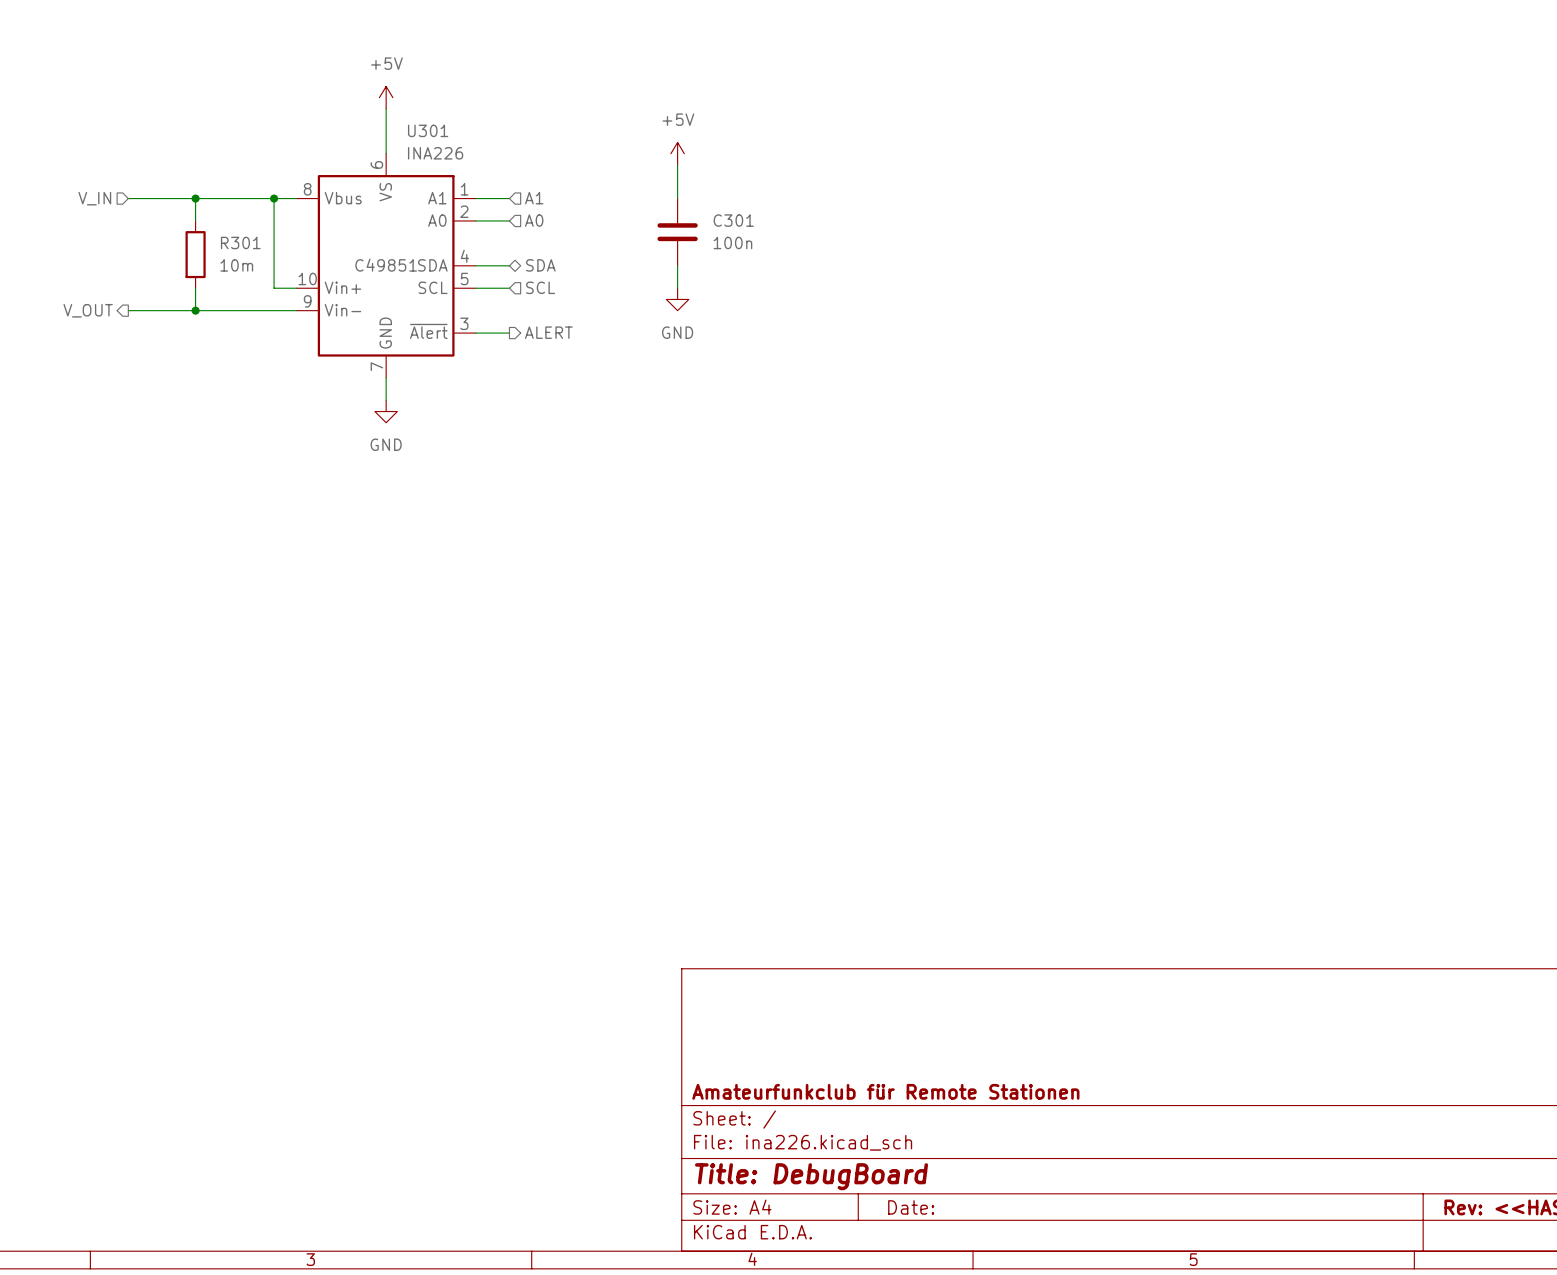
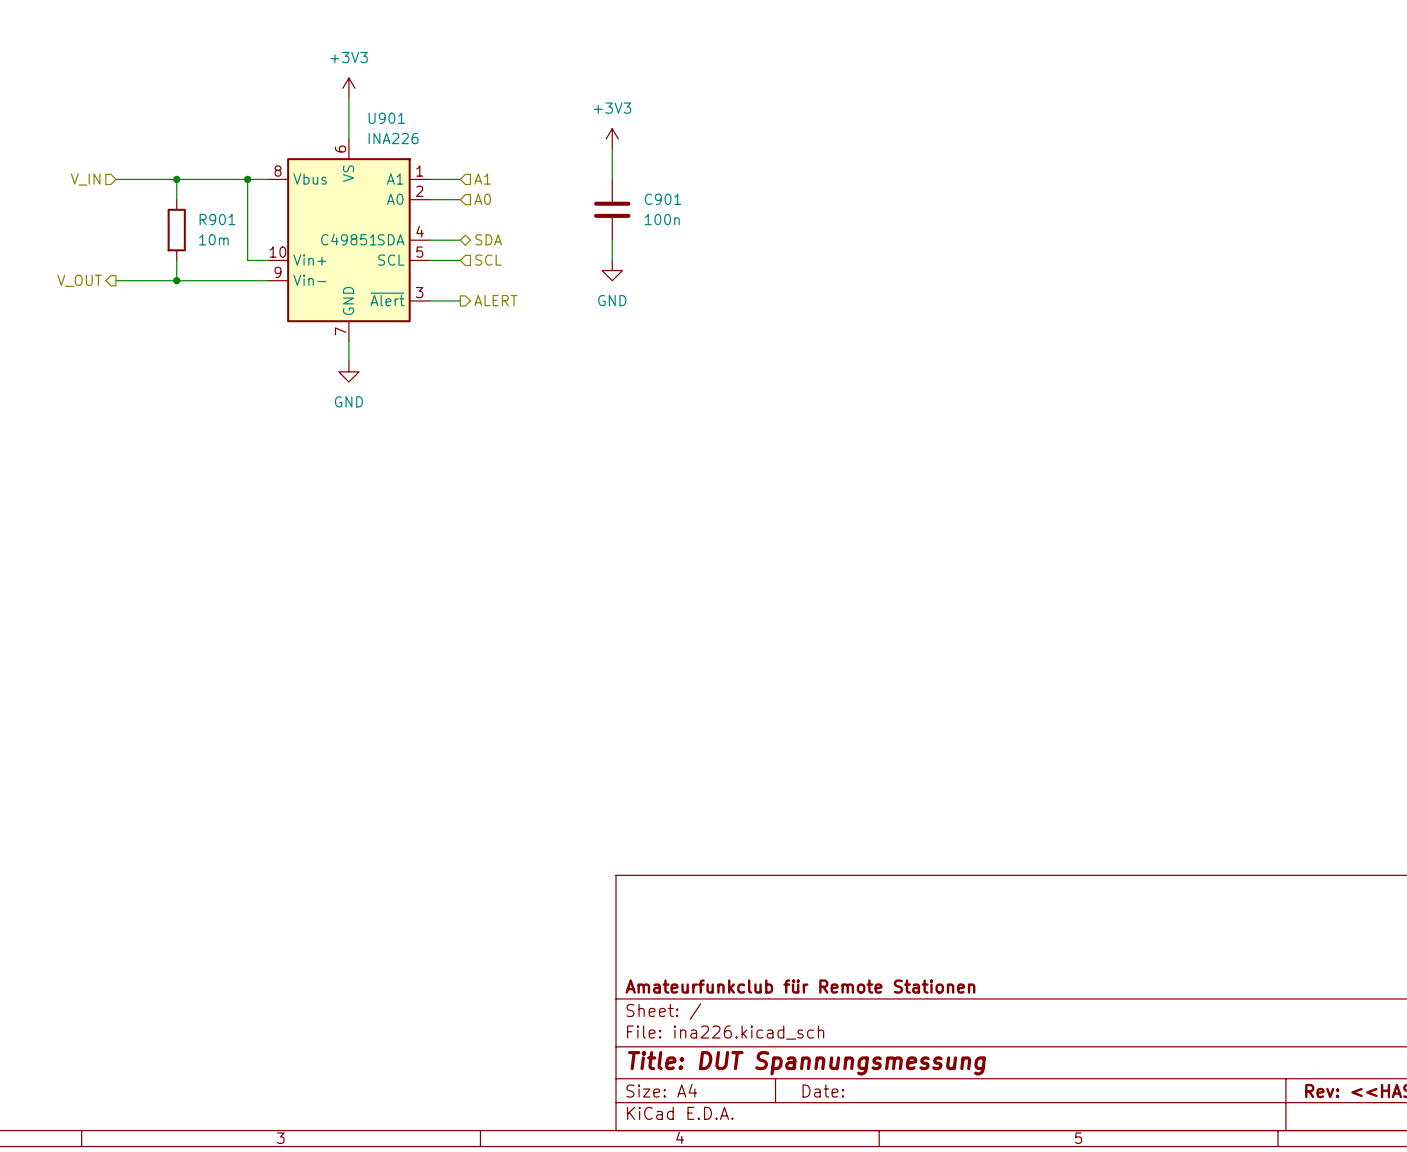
power symbol: +5V (386, 97) -> +3V3 (348, 88)
U301 name: U301 (428, 130) -> U901 (386, 118)
power symbol: +5V (677, 153) -> +3V3 (612, 138)
C301 name: C301 (733, 220) -> C901 (662, 199)
R301 name: R301 (240, 242) -> R901 (217, 219)
title block: Title: DebugBoard (811, 1176) -> Title: DUT Spannungsmessung (807, 1063)

